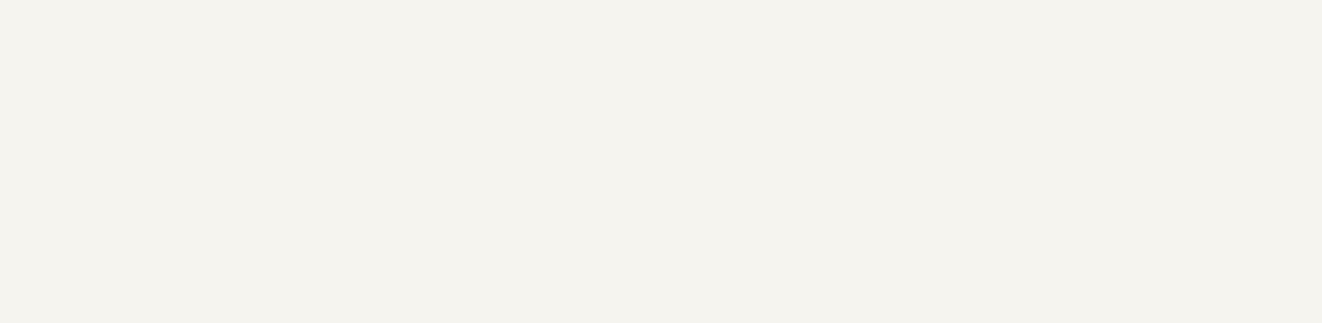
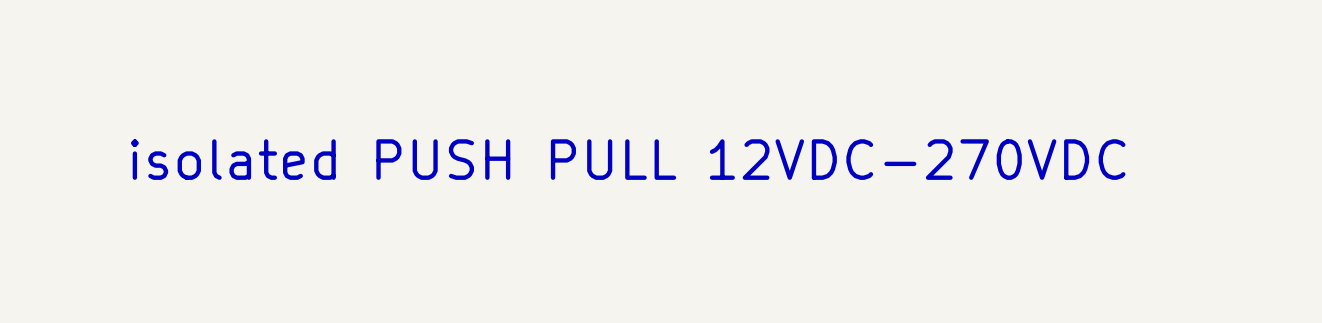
text: none -> isolated PUSH PULL 12VDC-270VDC (628, 159)

